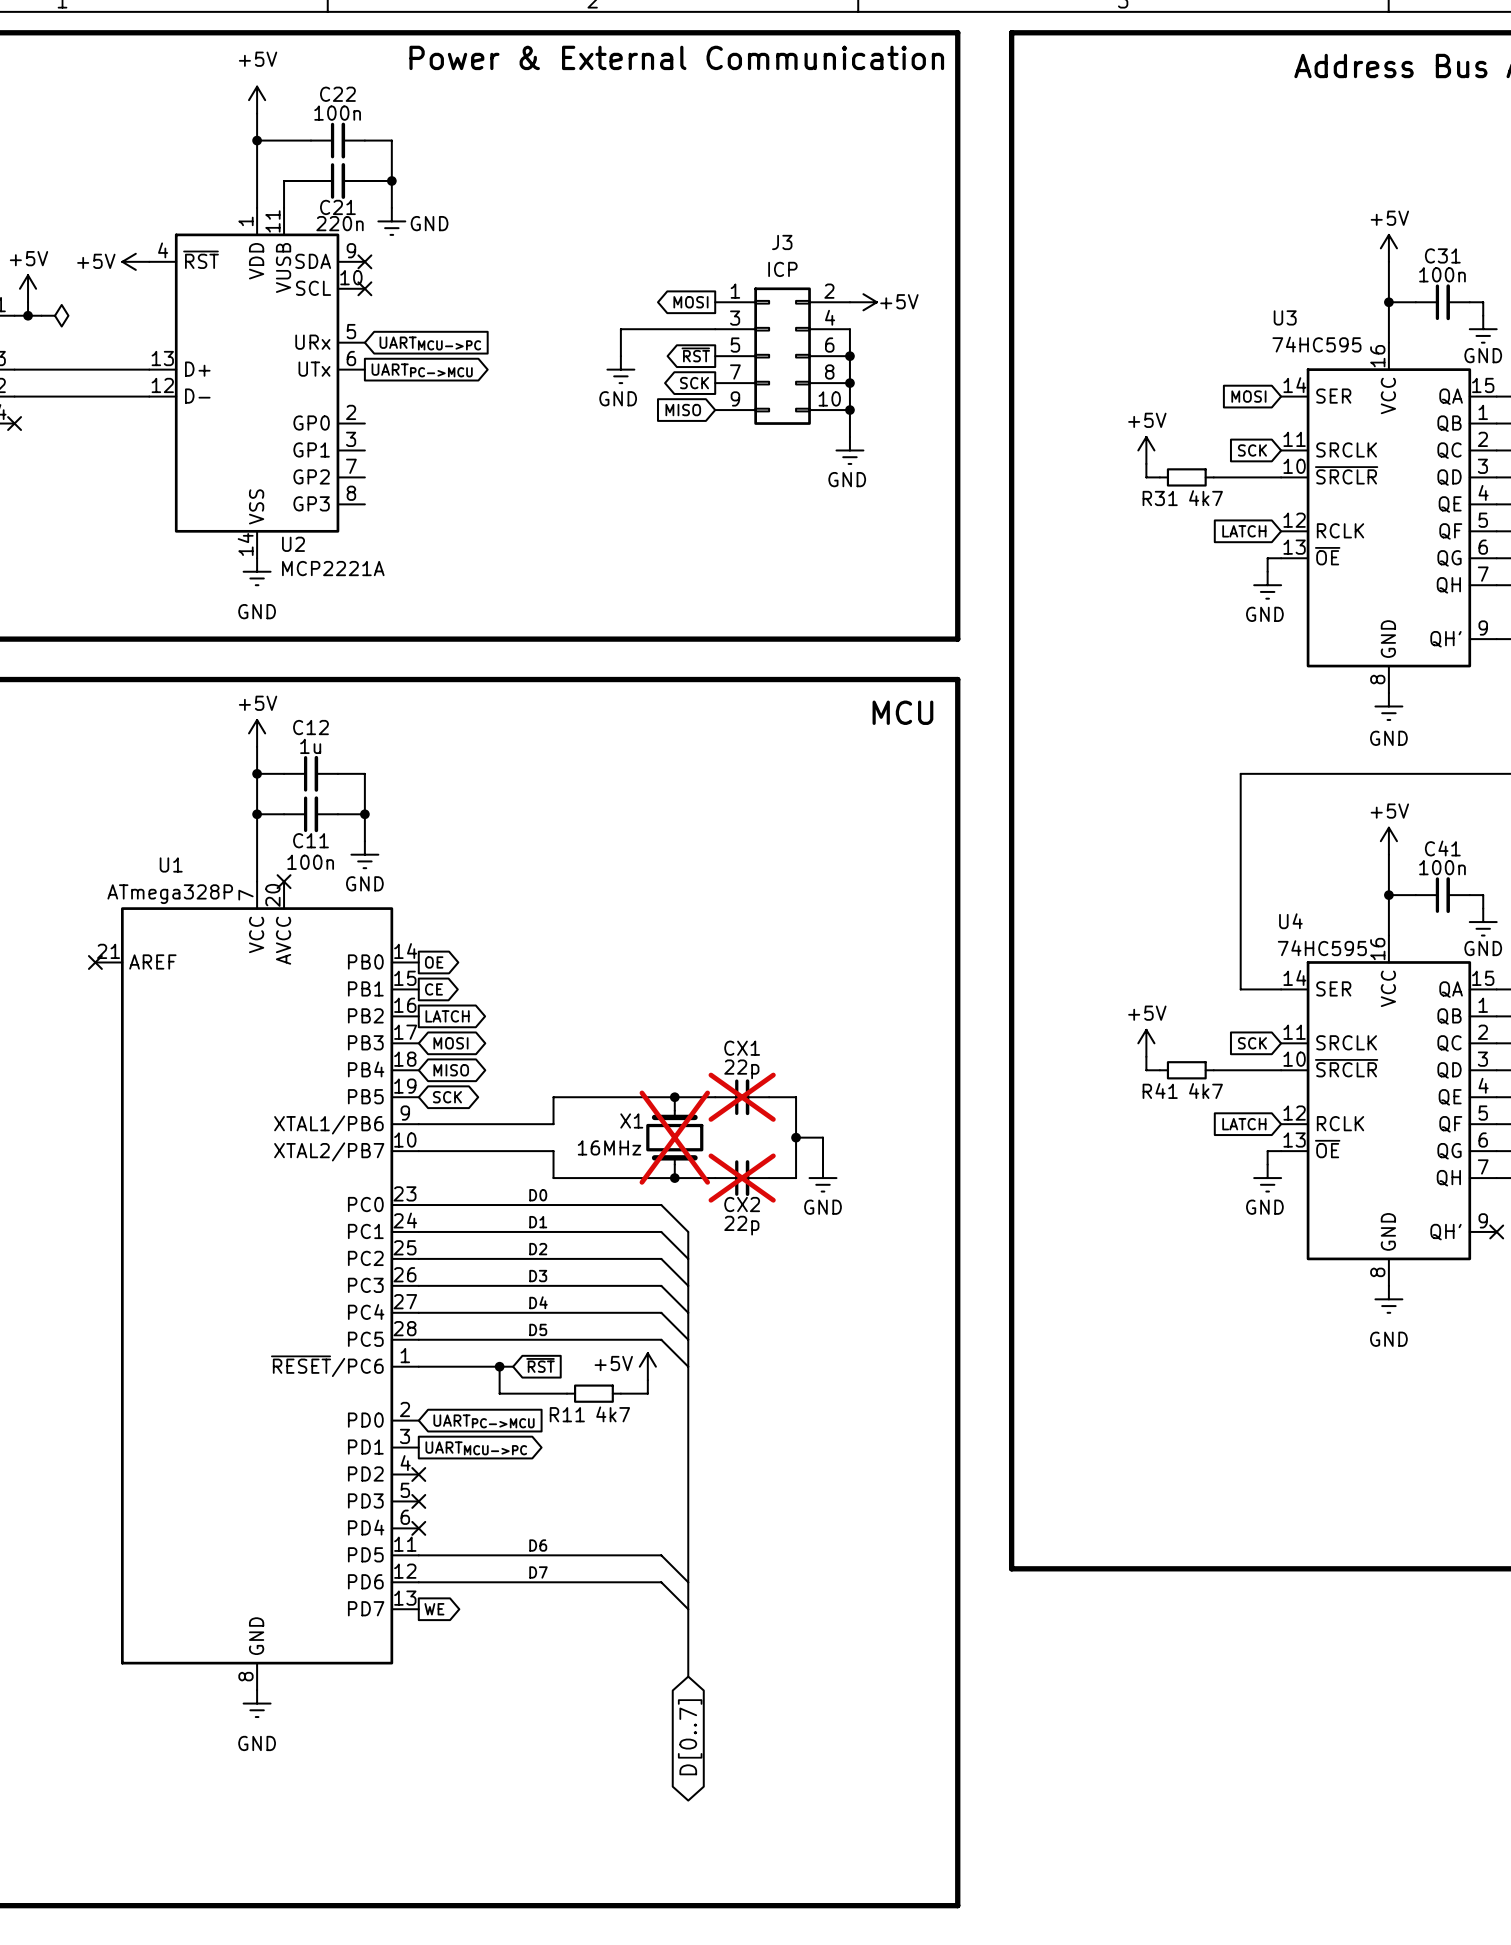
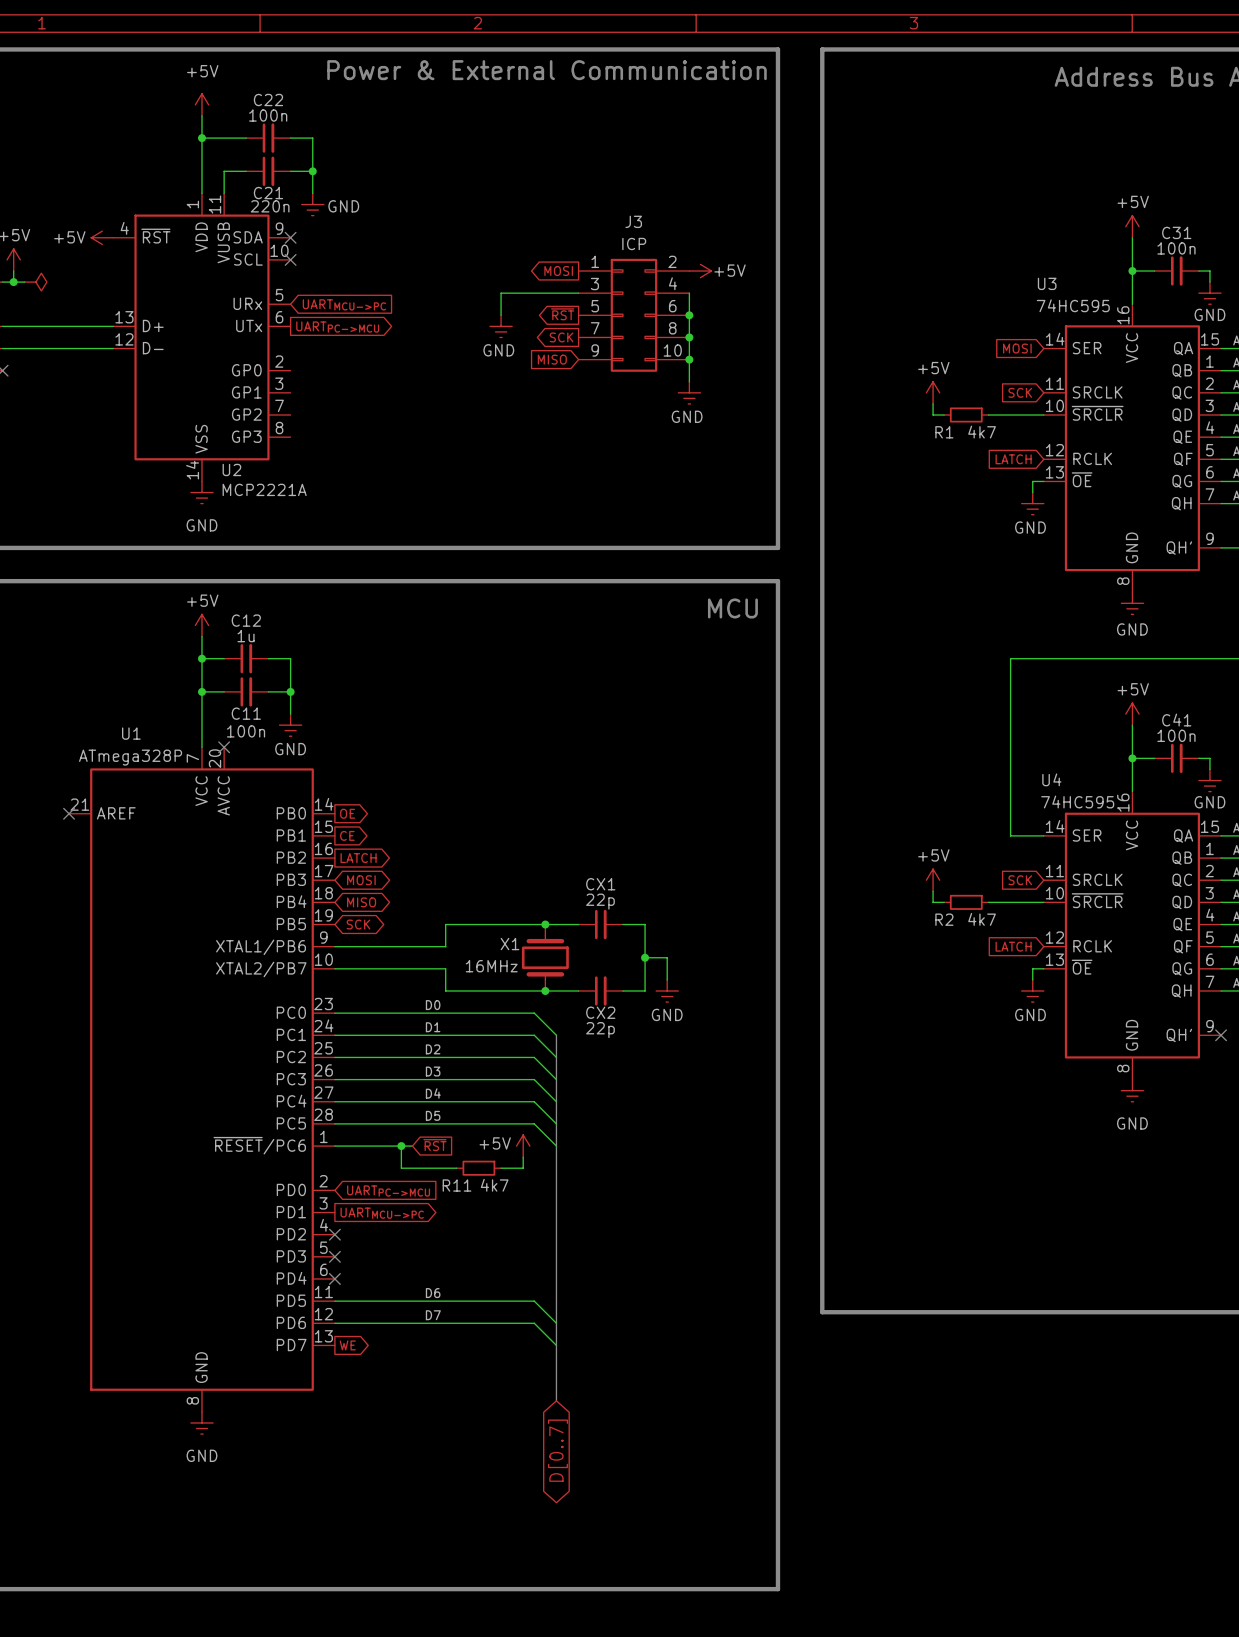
R31 name: R31 (1160, 498) -> R1 (944, 432)
R41 name: R41 (1160, 1091) -> R2 (944, 919)
CX1 do-not-place cross: (742, 1097) -> none
X1 do-not-place cross: (674, 1137) -> none
CX2 do-not-place cross: (742, 1178) -> none

